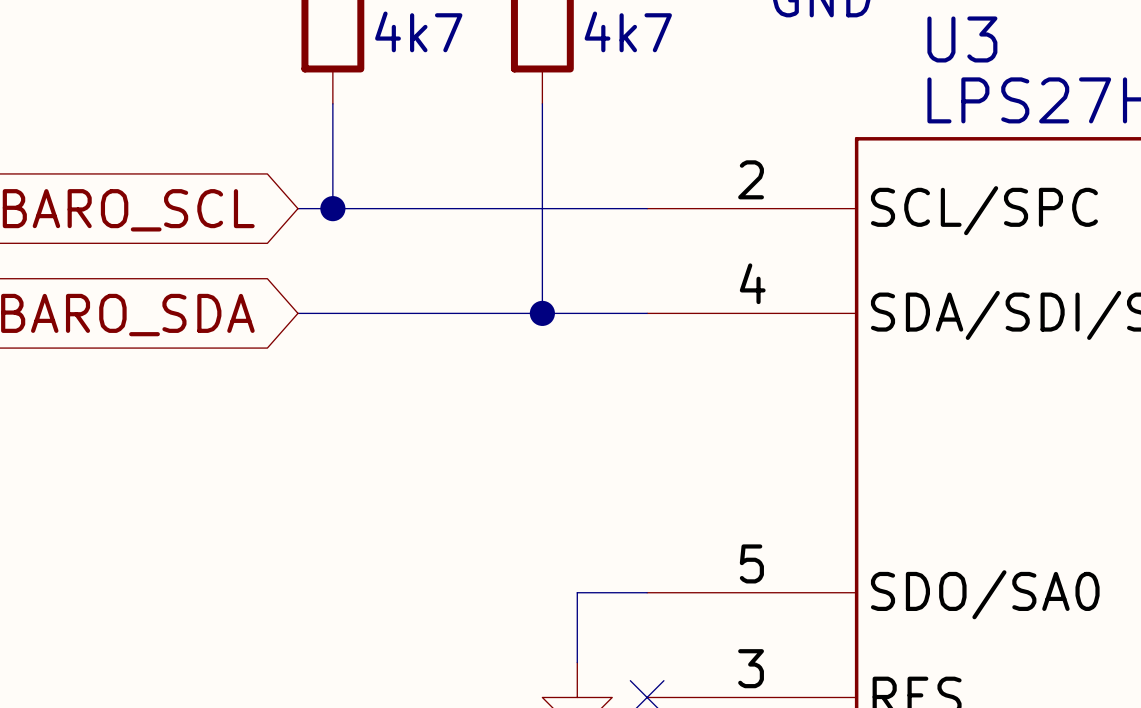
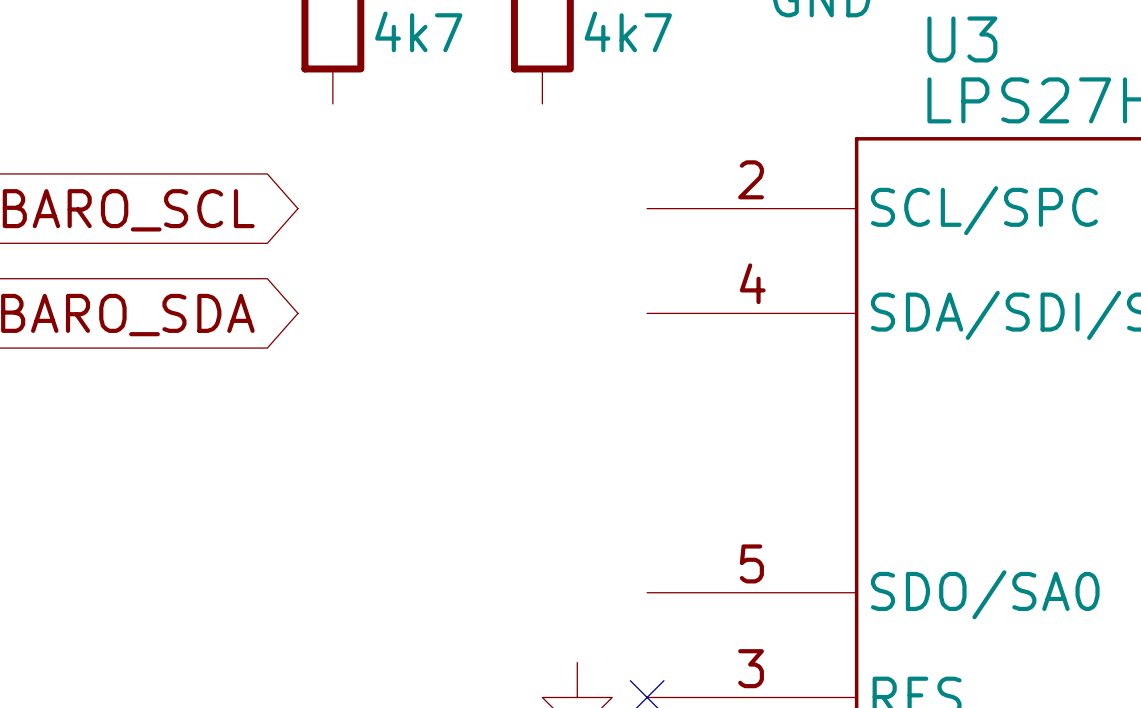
wire: (332, 103) (332, 208) -> none
wire: (542, 103) (542, 313) -> none
wire: (297, 208) (647, 208) -> none
junction: (332, 208) -> none
wire: (297, 313) (647, 313) -> none
junction: (542, 313) -> none
wire: (647, 592) (577, 592) (577, 662) -> none

